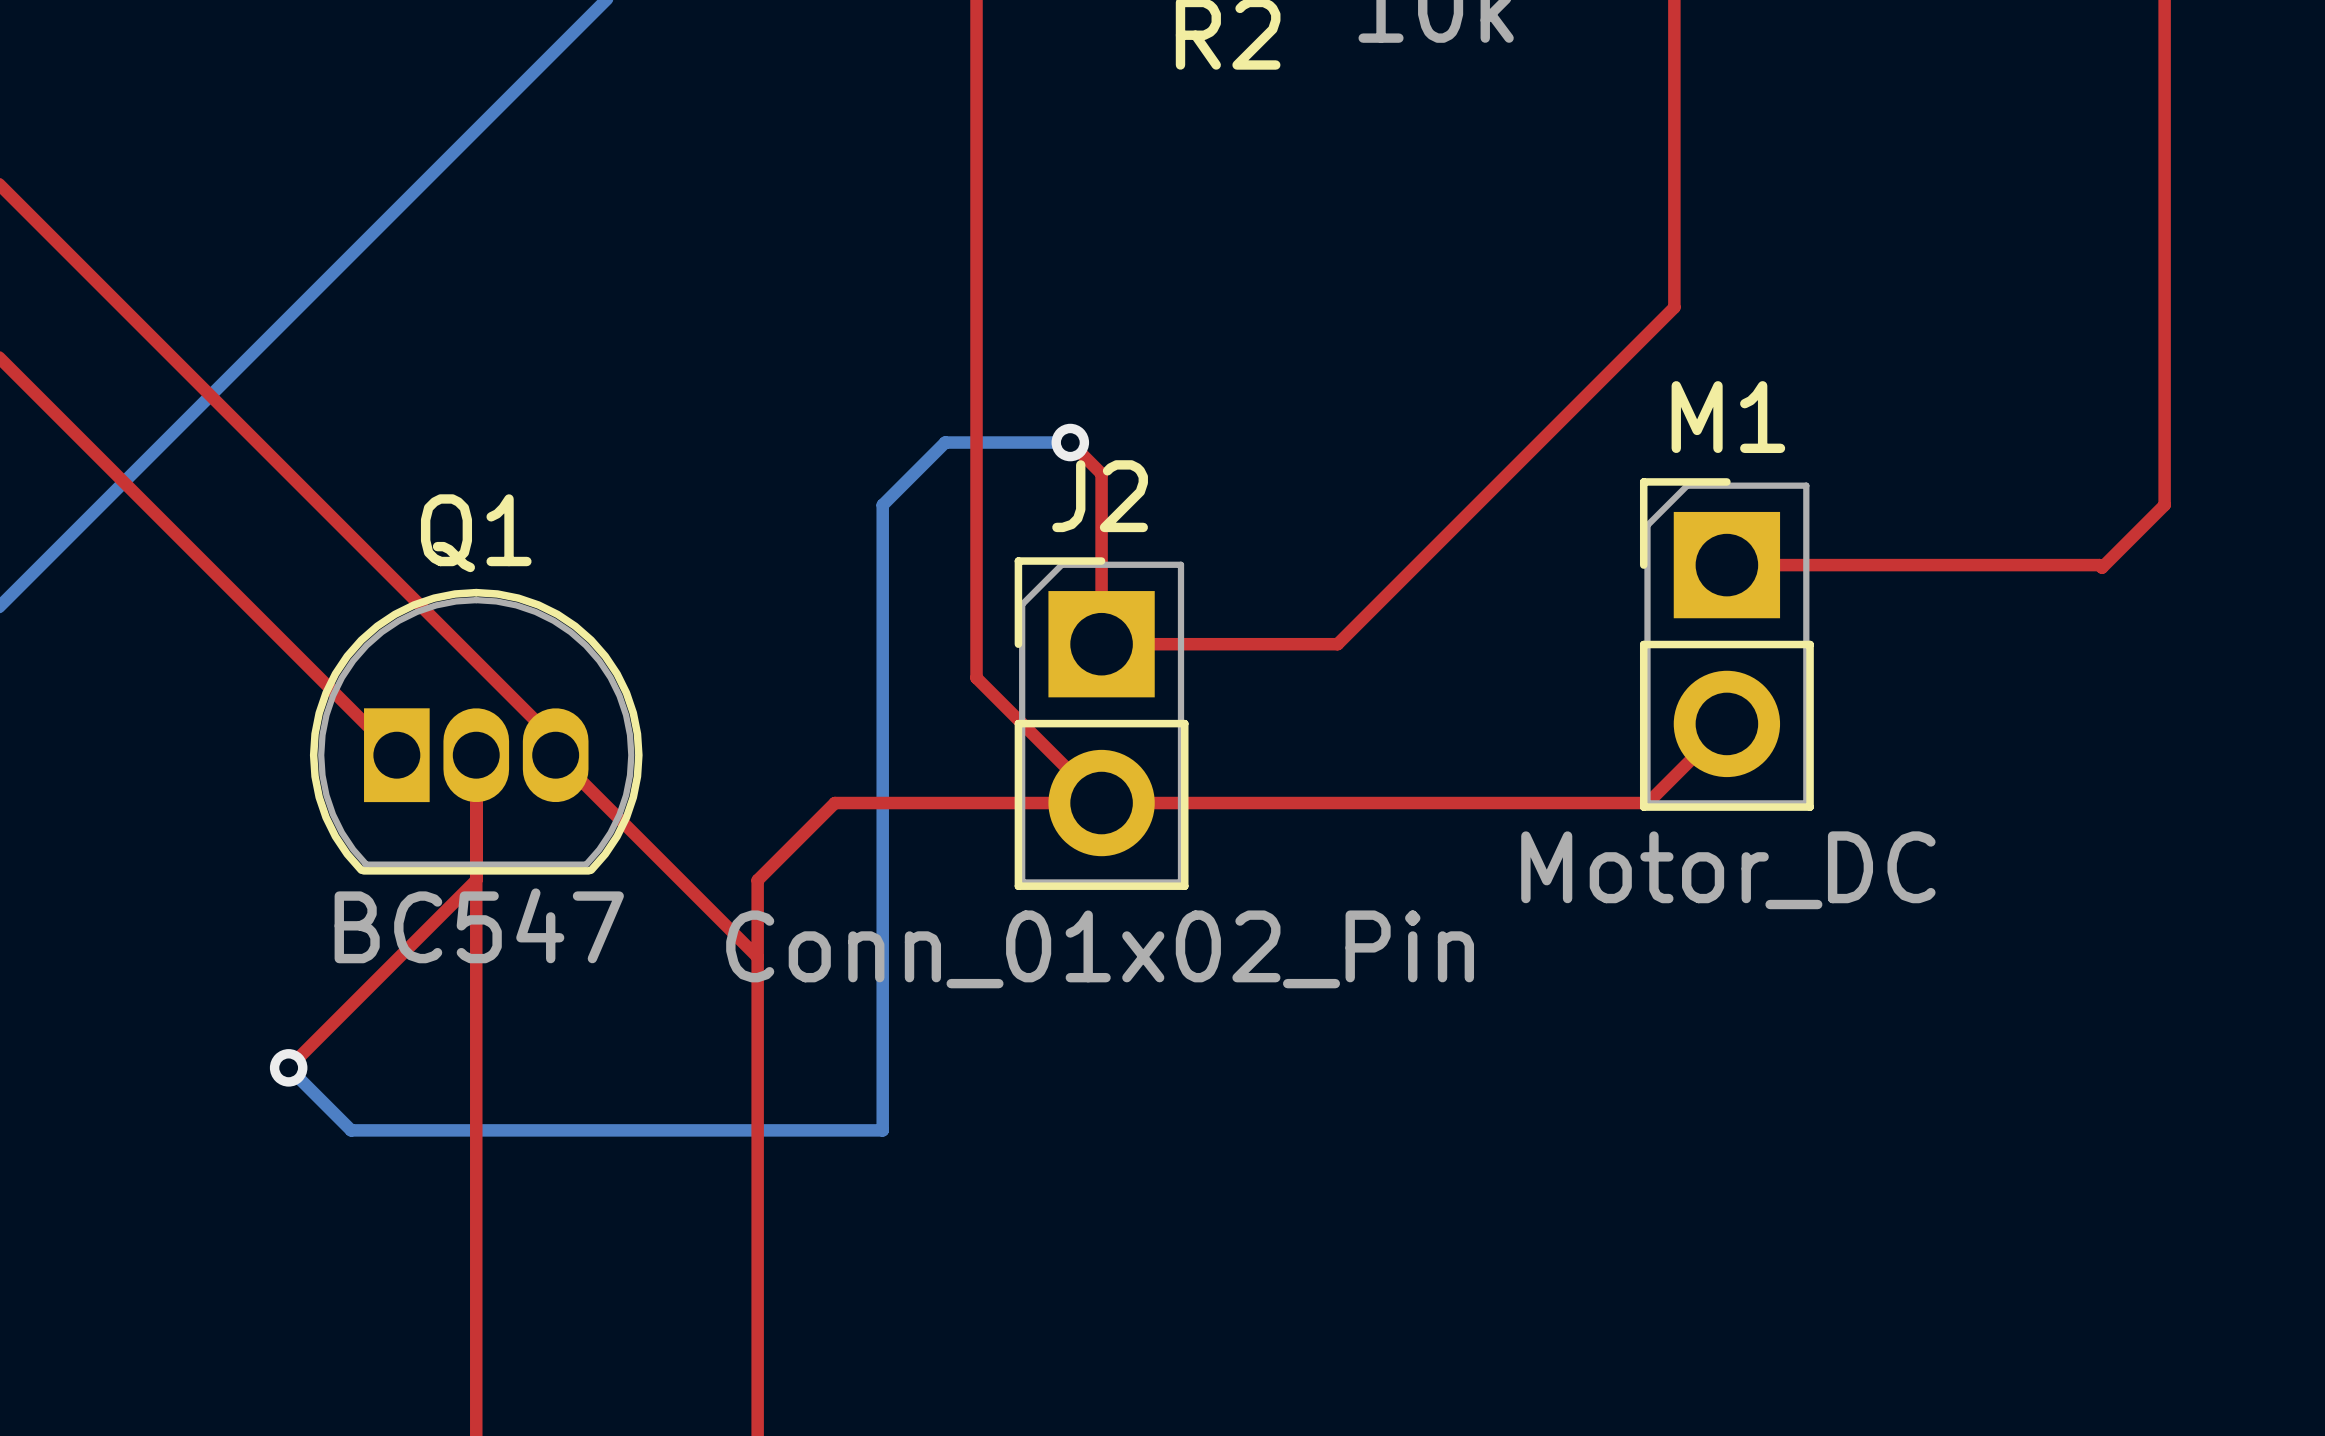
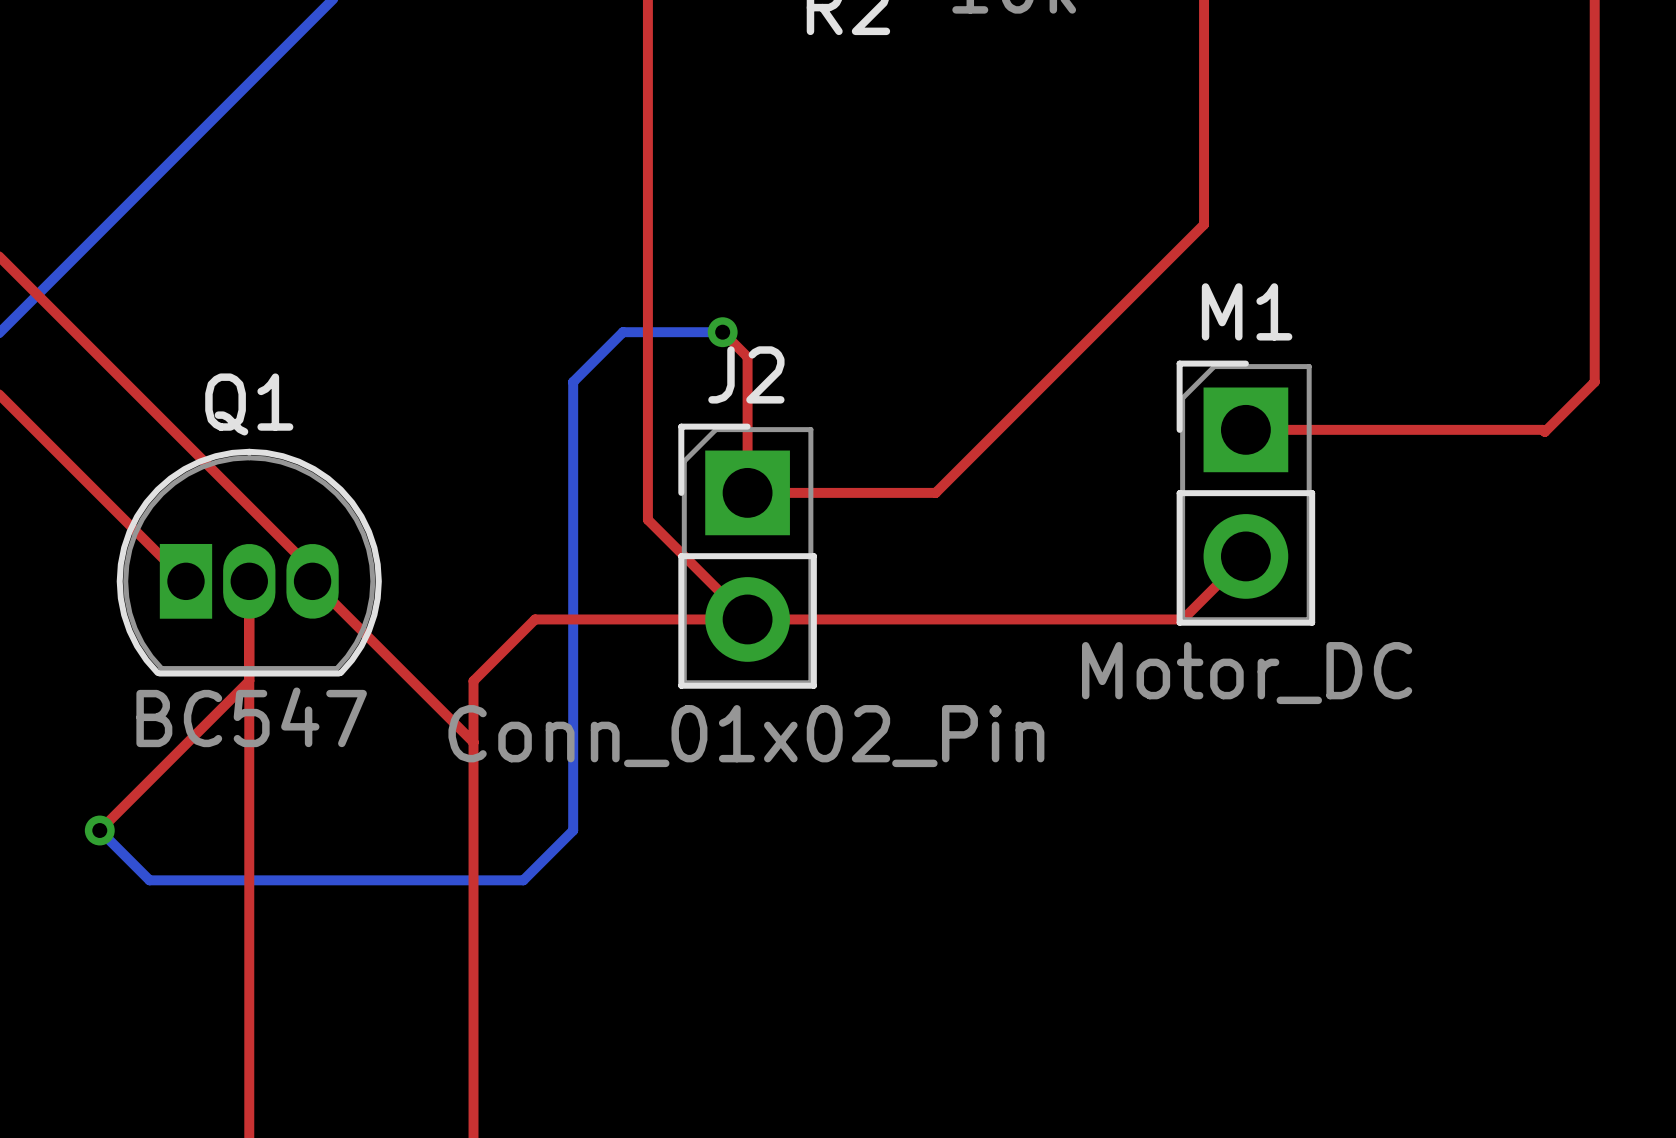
bottom track: (882, 1067) (882, 1130) (820, 1130) -> (573, 830) (523, 880)

